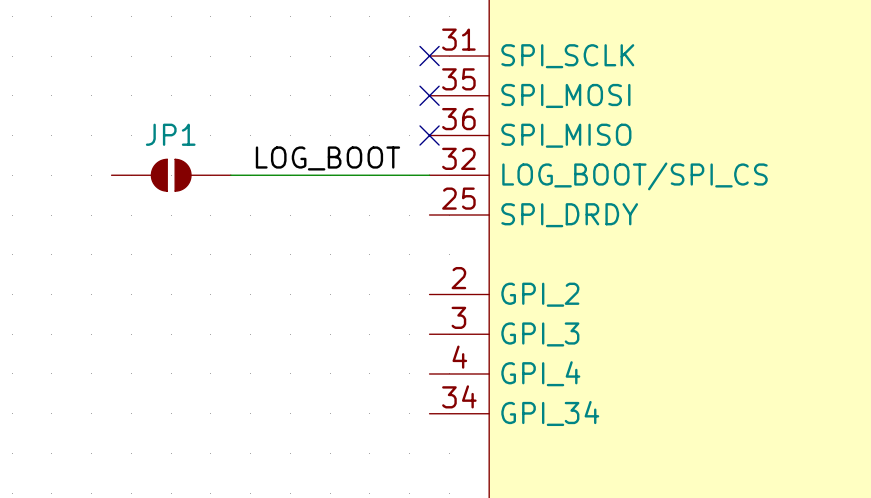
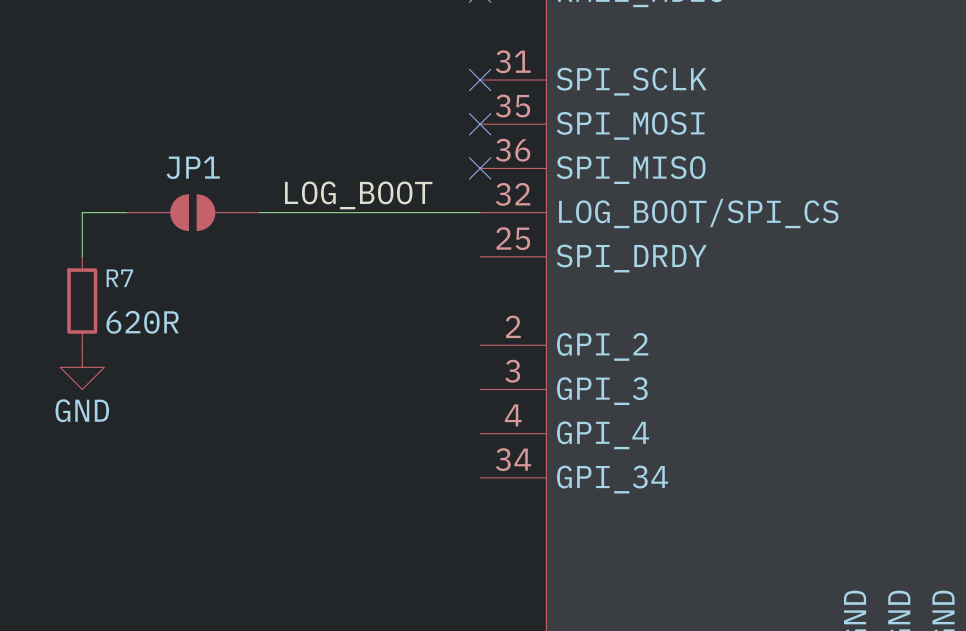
wire: none -> (126, 212) (82, 212) (82, 256)
R7: none -> 620R (82, 301)
power symbol: none -> GND (82, 367)

